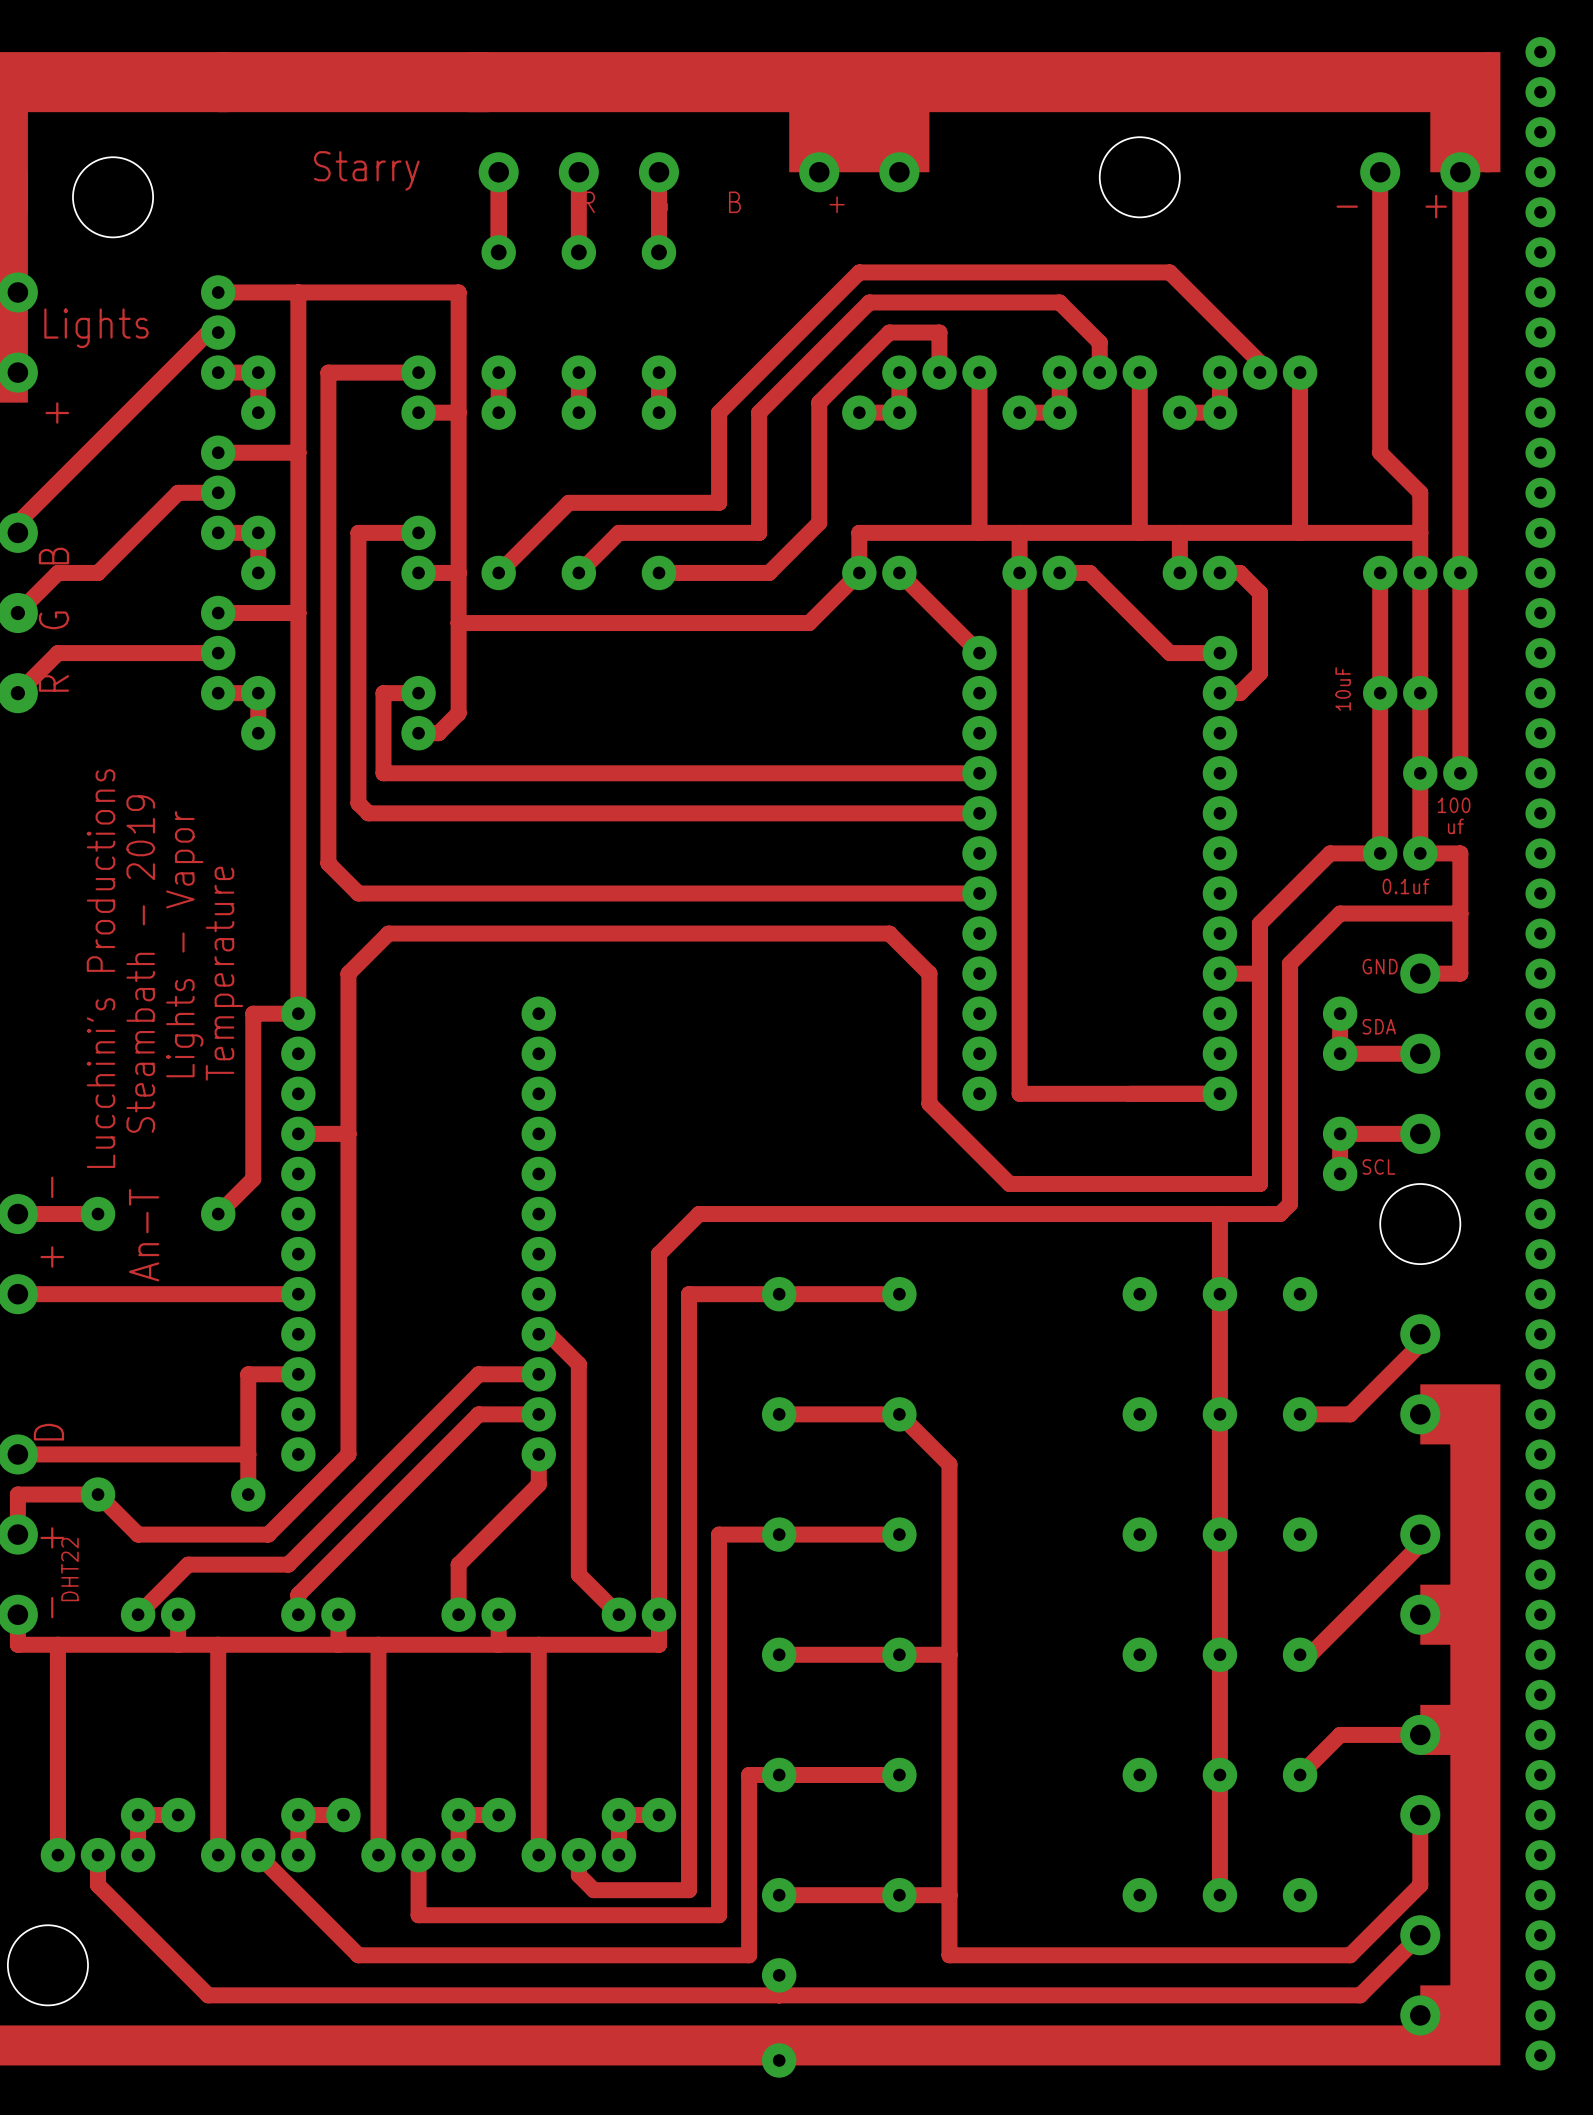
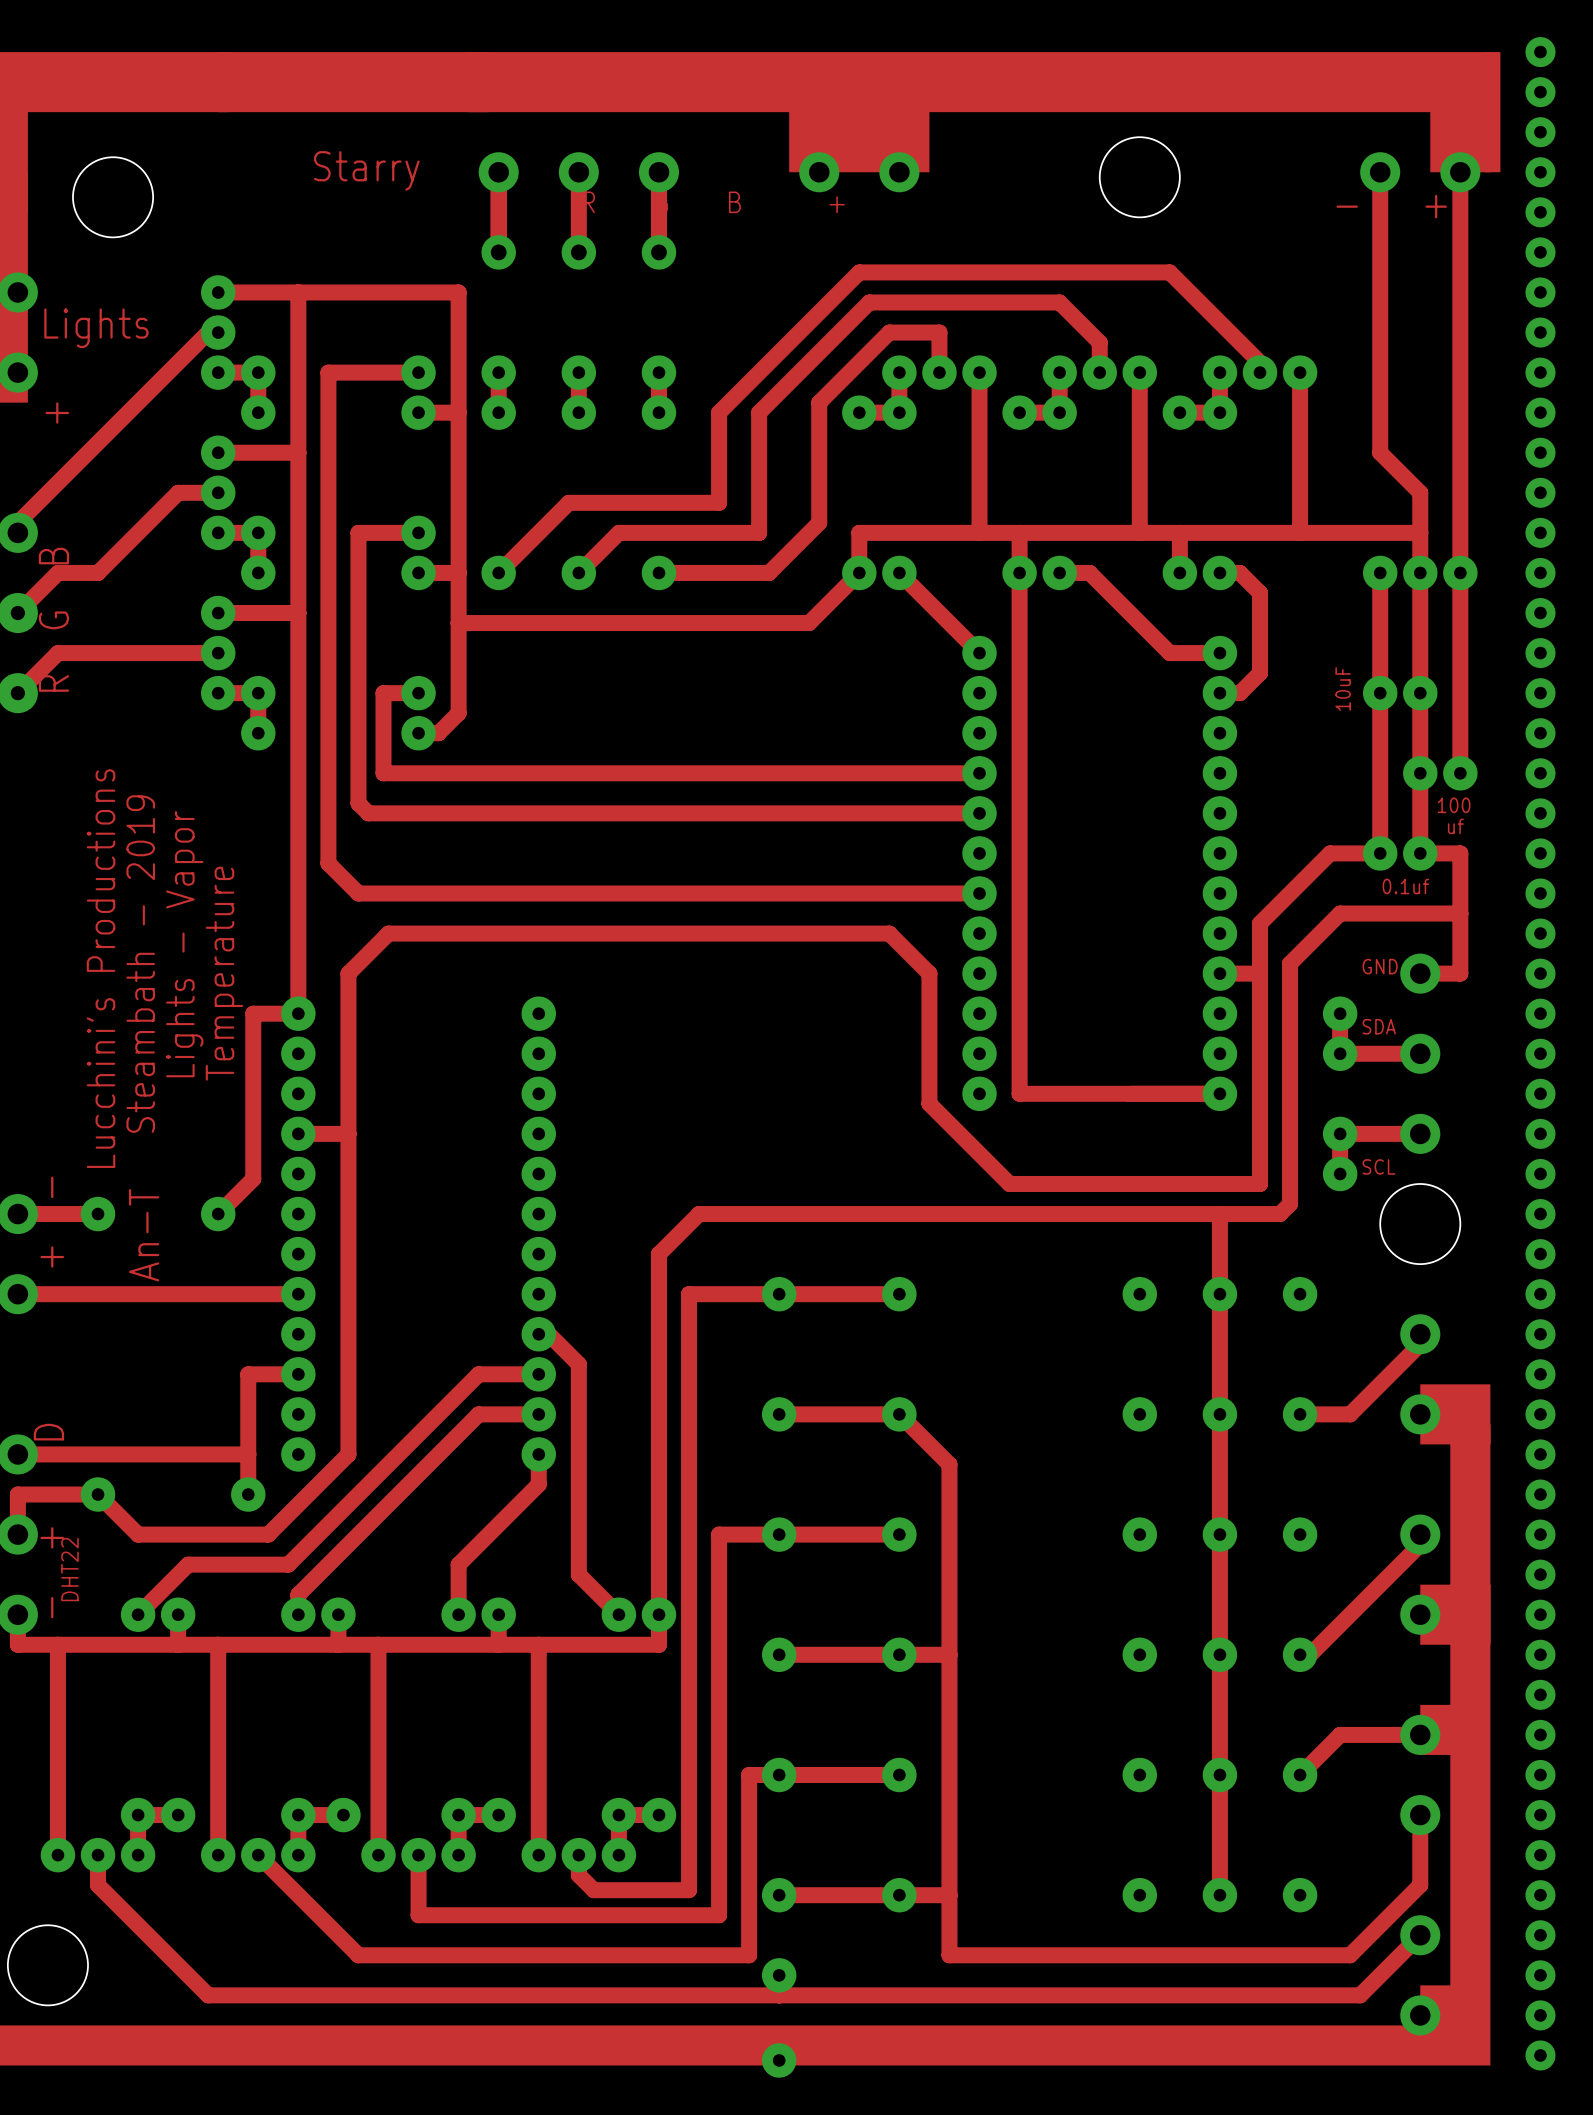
drawing: [1490, 1384, 1501, 2066] -> none

